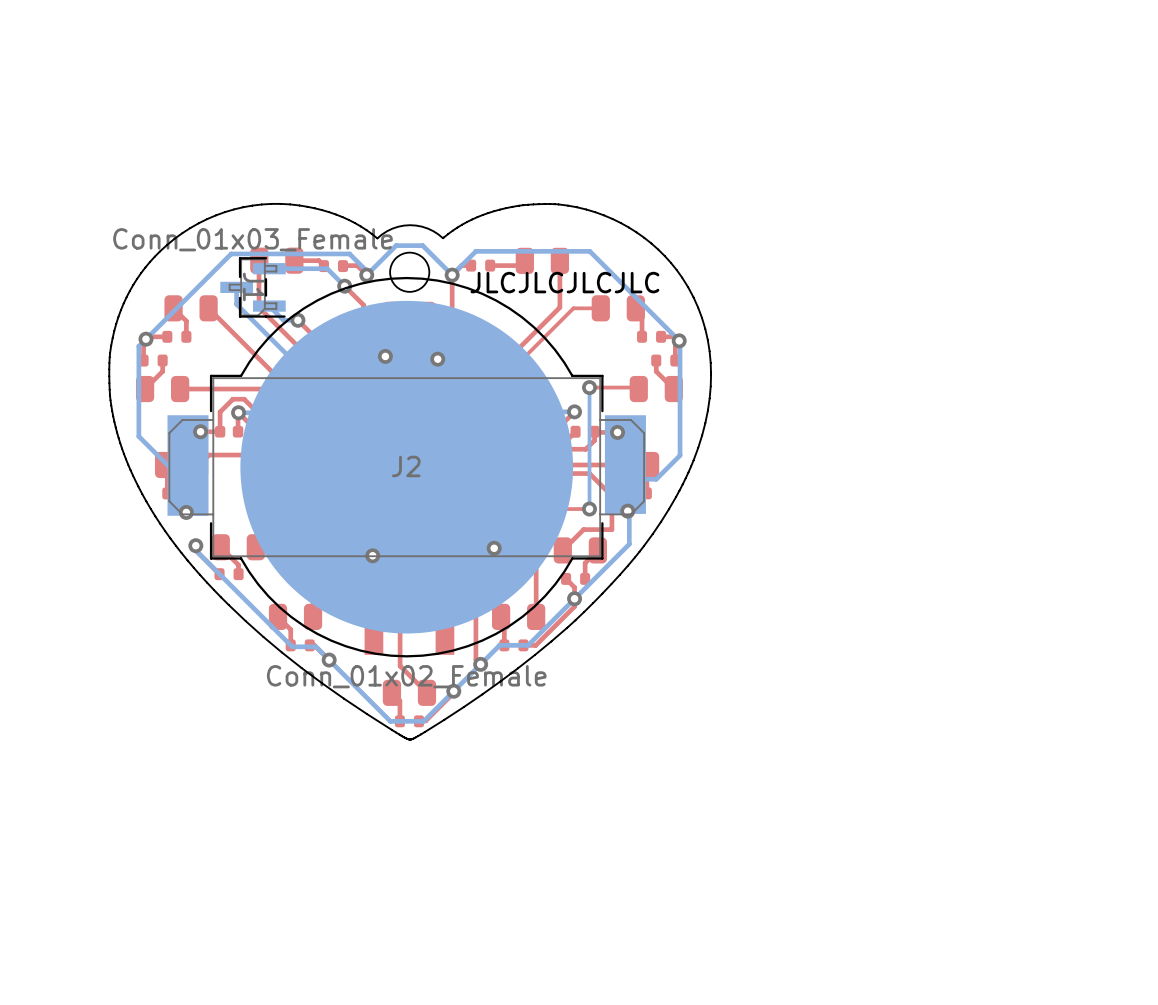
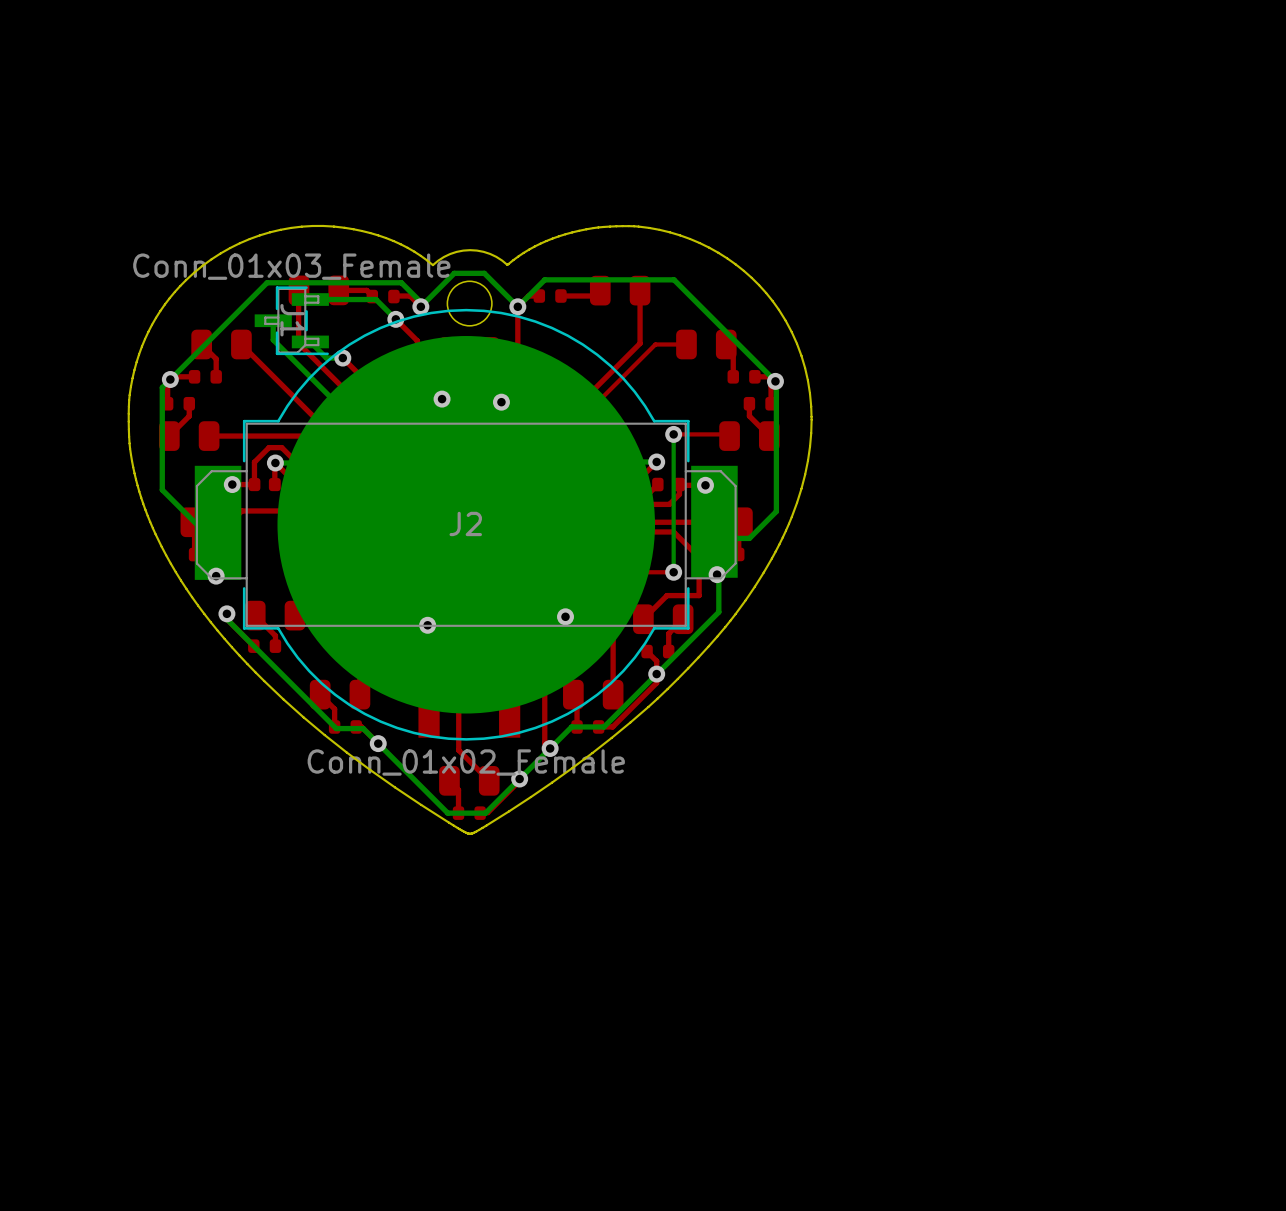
text: JLCJLCJLCJLC (564, 282) -> none

